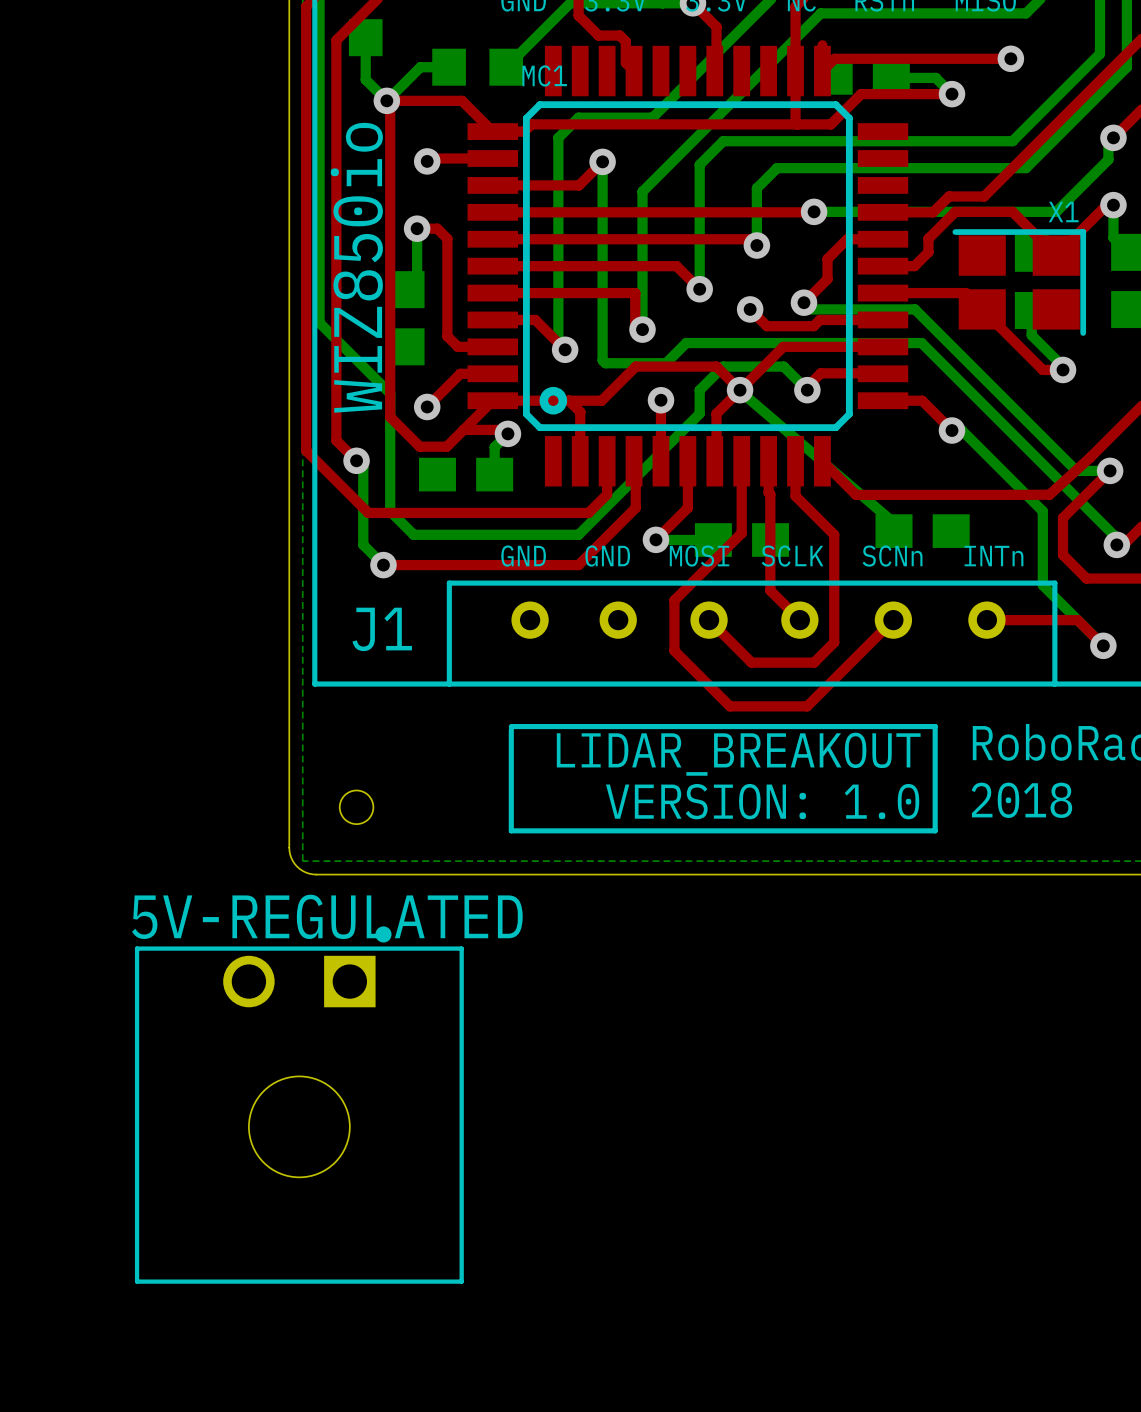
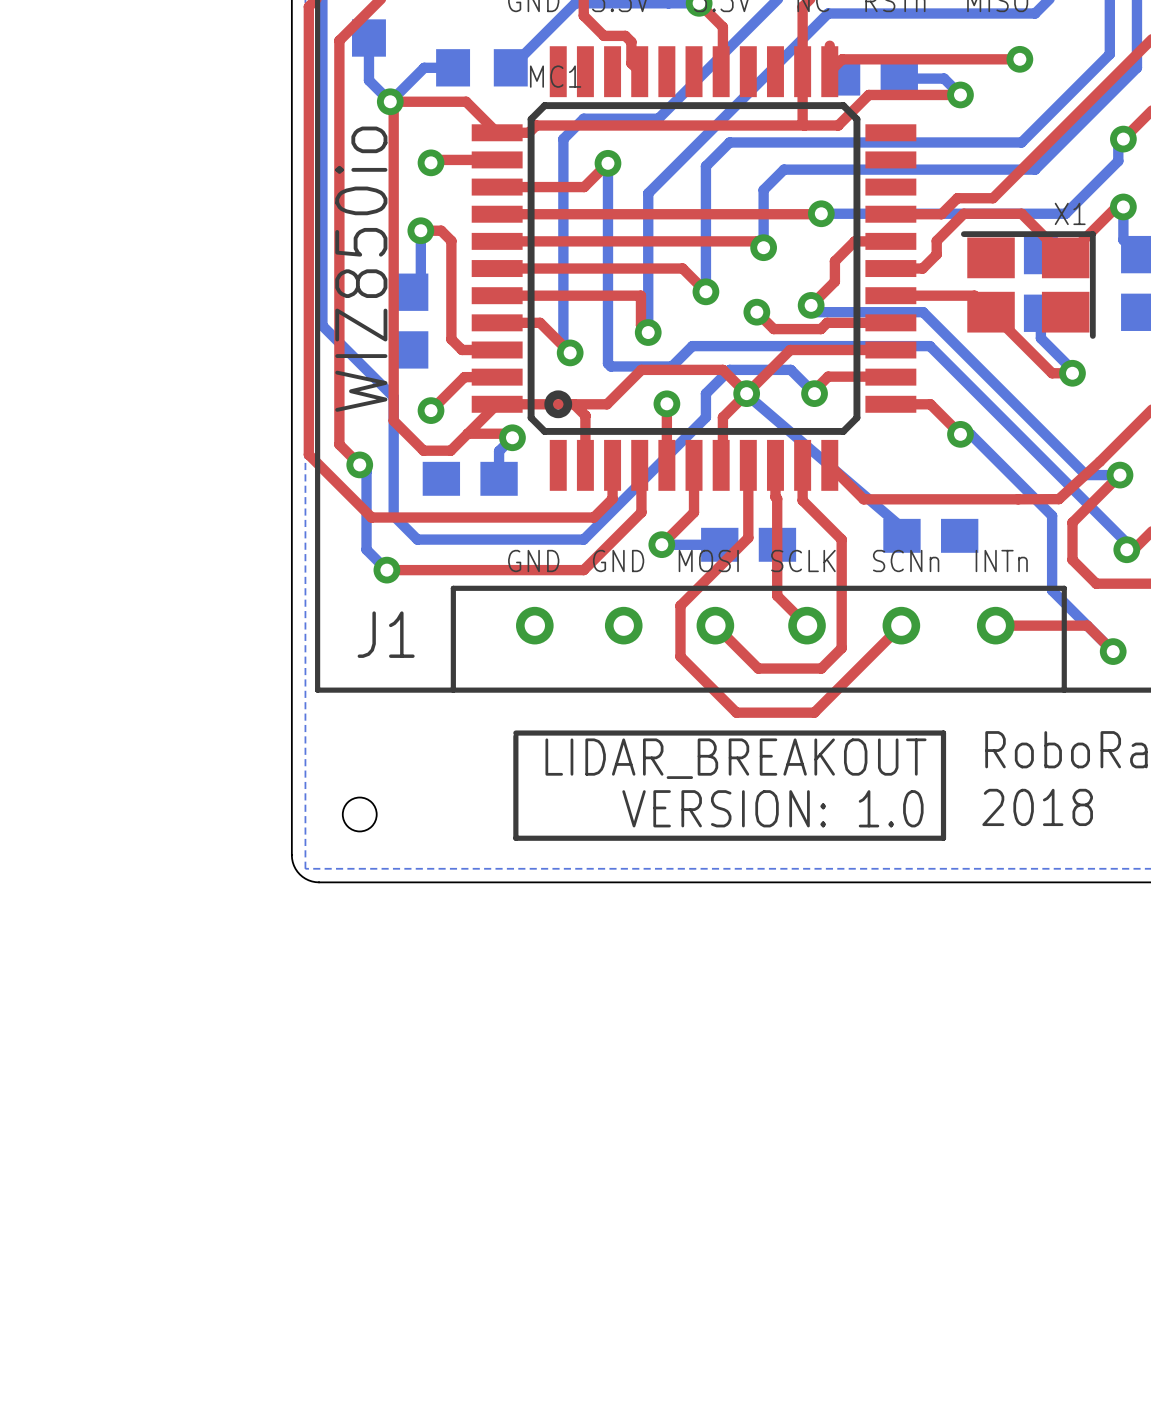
5V-REGULATED: (299, 1105) -> none

